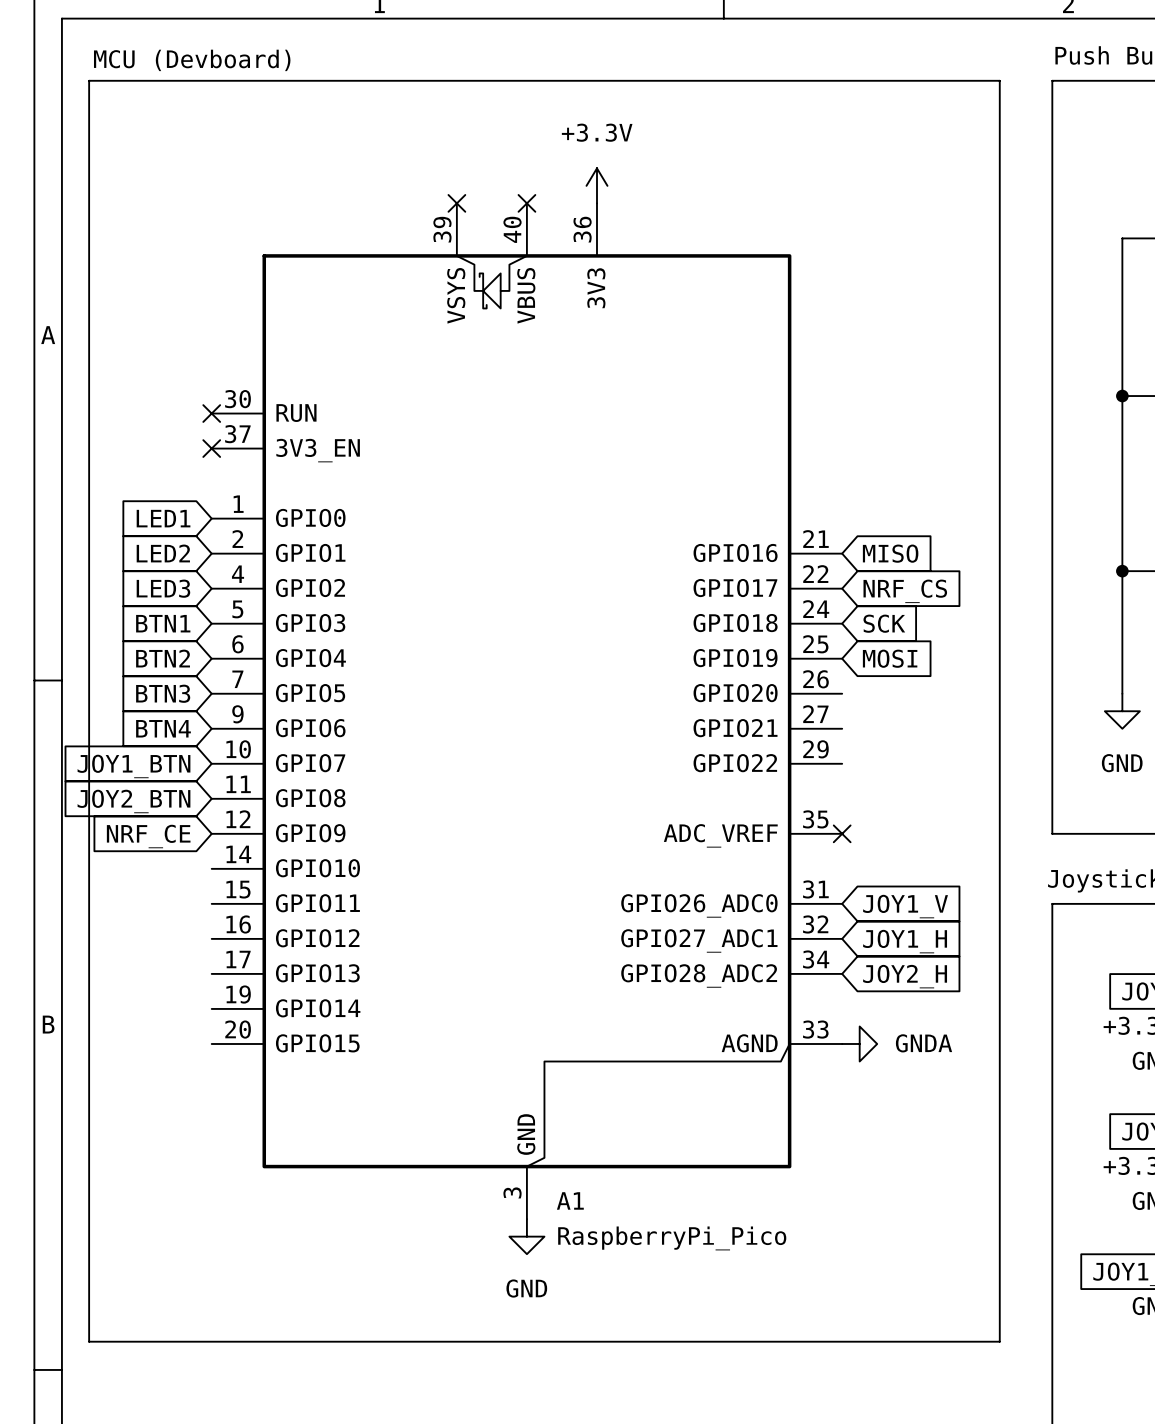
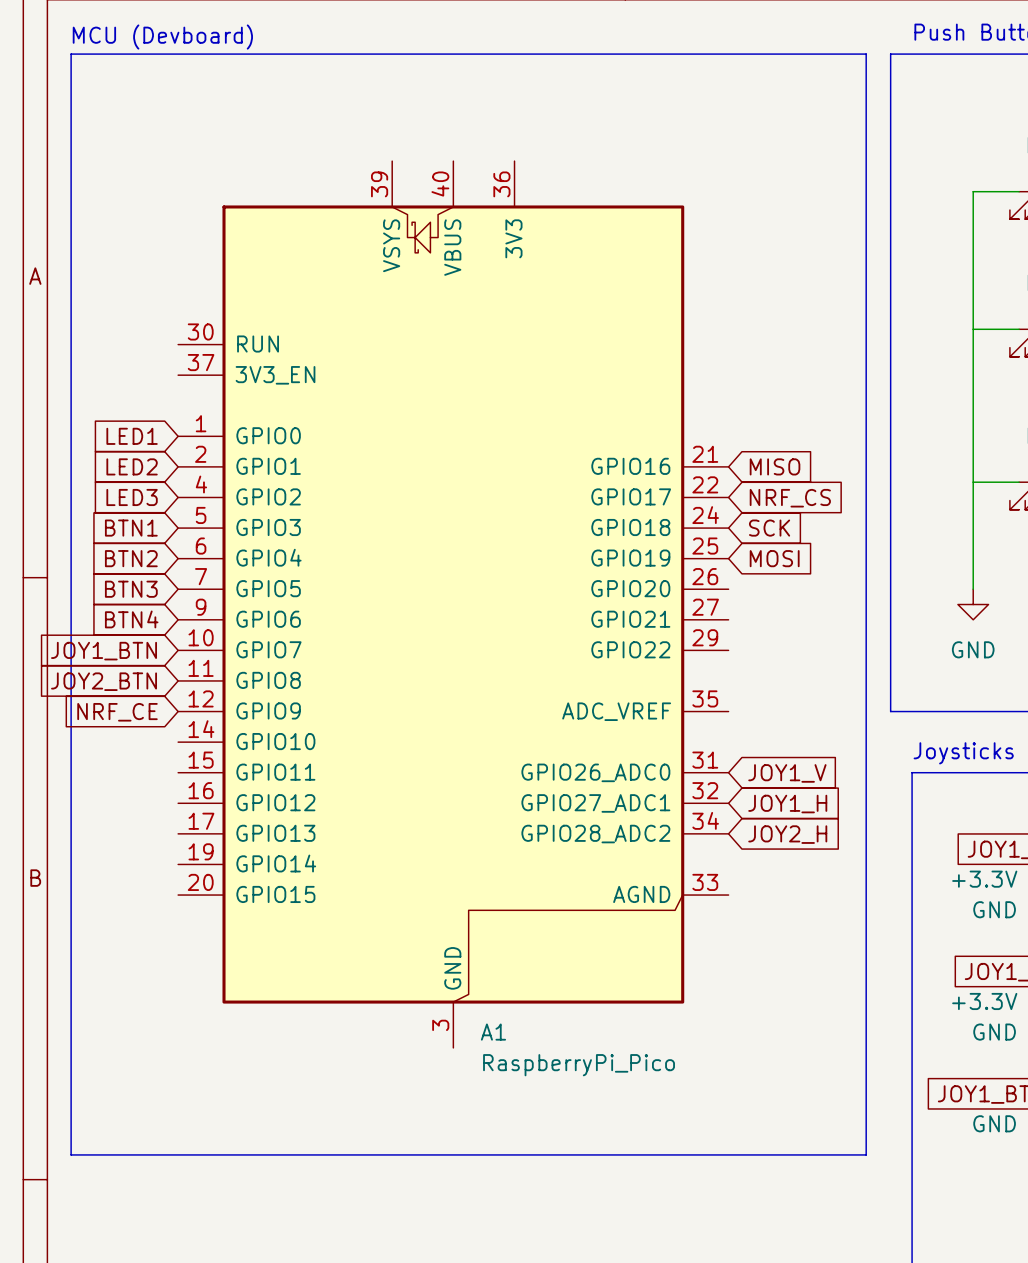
line: (1052, 80) (1052, 833) -> (912, 54) (890, 54) (890, 711) (912, 711)
power symbol: +3.3V (596, 185) -> none
no-connect mark: (456, 203) -> none
no-connect mark: (526, 203) -> none
junction: (1122, 396) -> none
no-connect mark: (211, 413) -> none
no-connect mark: (211, 448) -> none
junction: (1122, 571) -> none
no-connect mark: (842, 833) -> none
power symbol: GNDA (859, 1043) -> none
power symbol: GND (526, 1236) -> none

